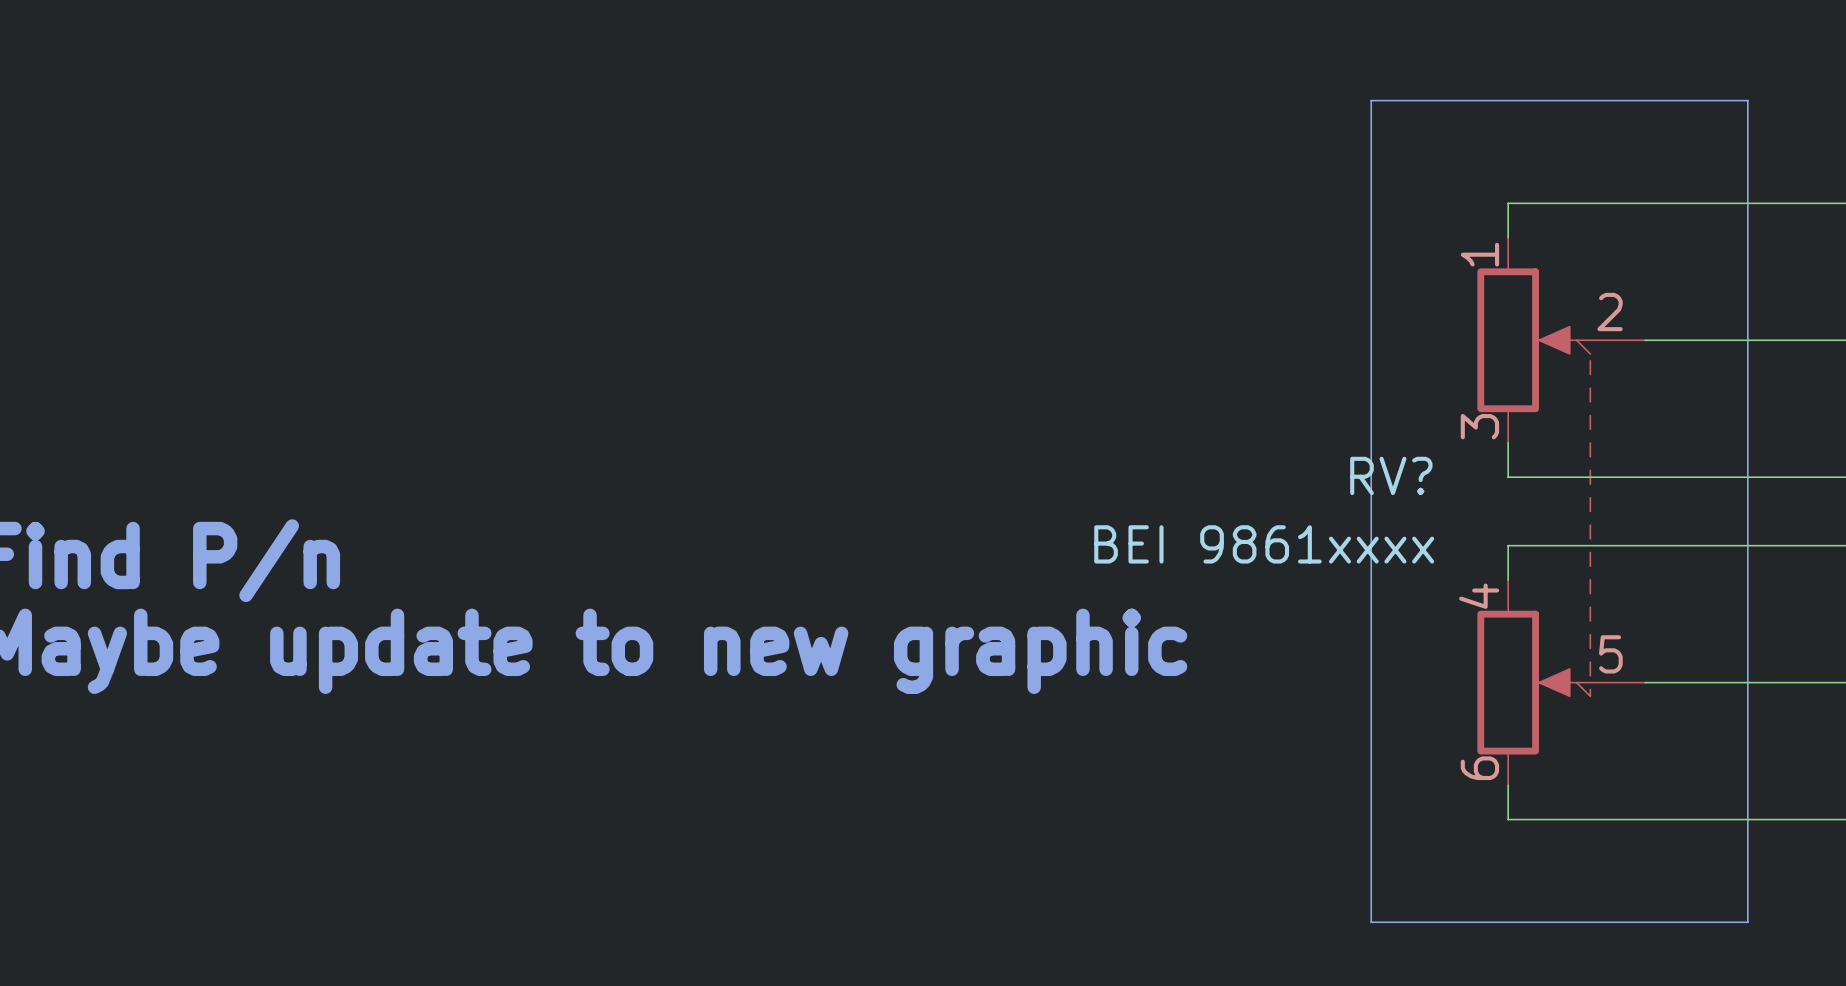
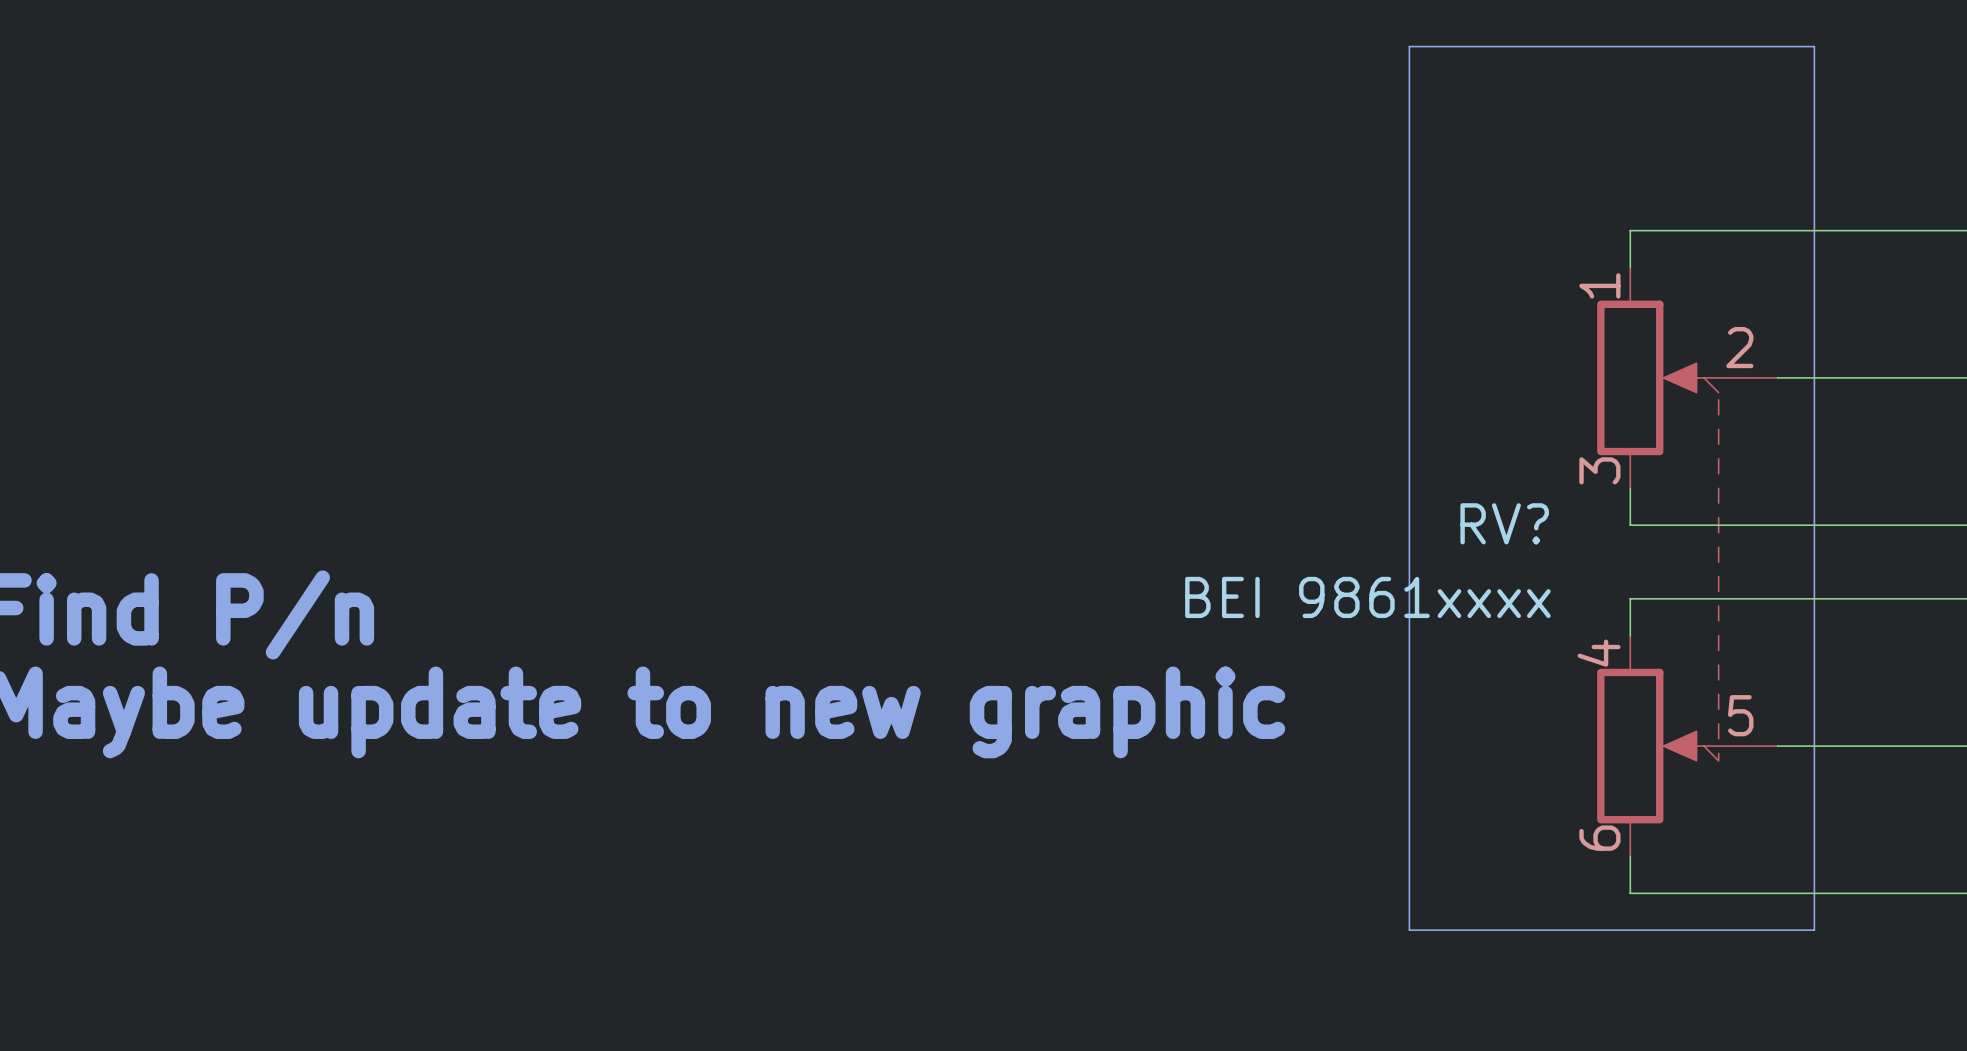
line: (1371, 100) (1747, 100) (1747, 922) (1371, 922) (1371, 100) -> (1409, 46) (1814, 46) (1814, 930) (1409, 930) (1409, 46)

